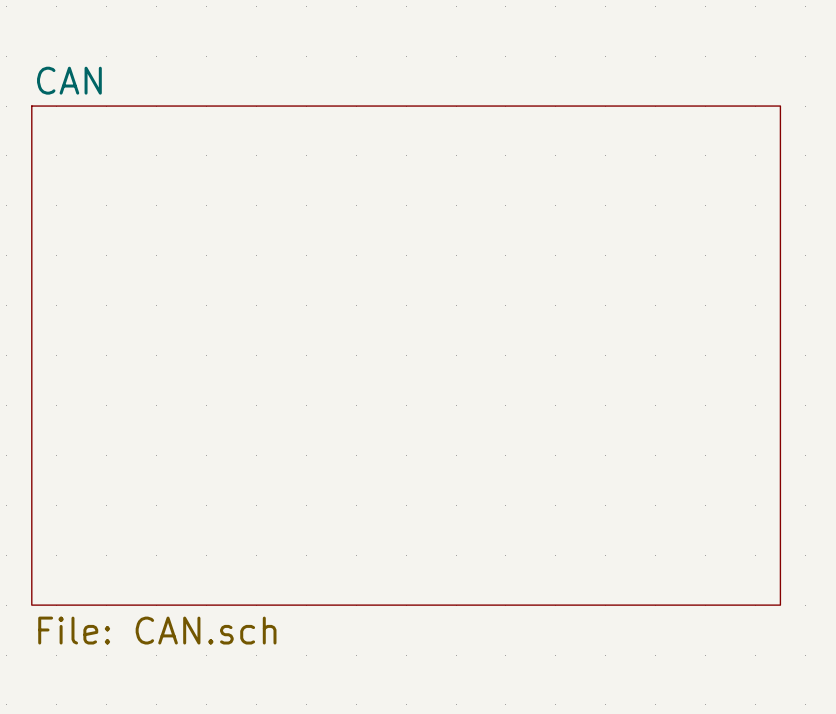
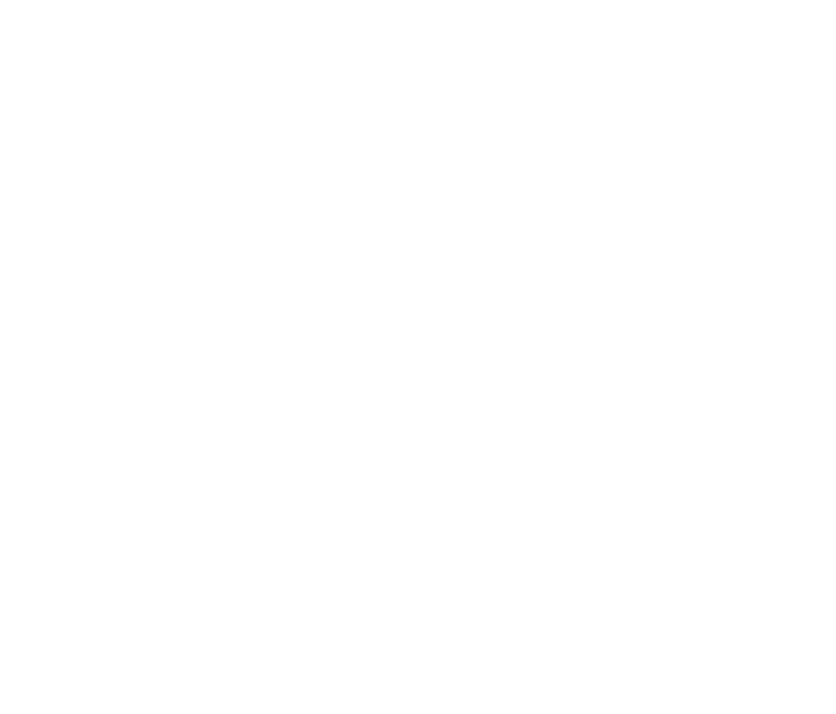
sheet CAN: File: CAN.sch (406, 355) -> none

